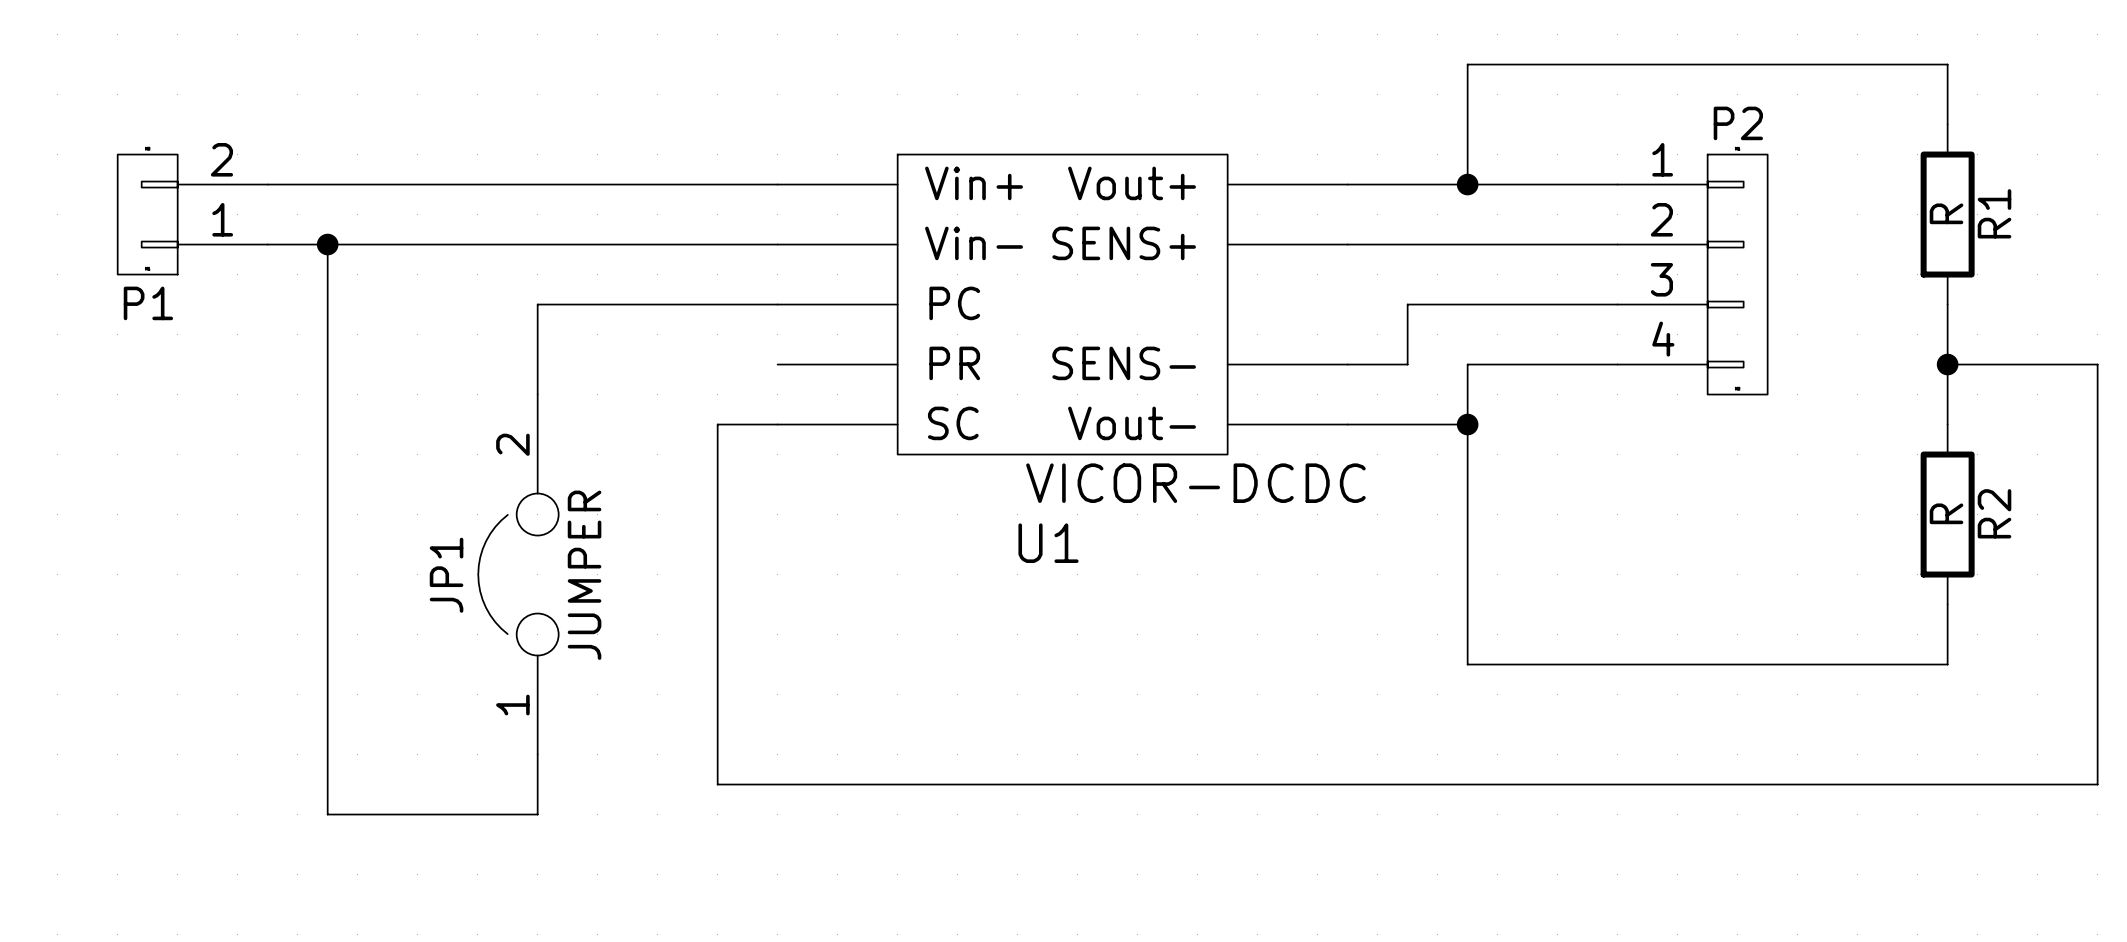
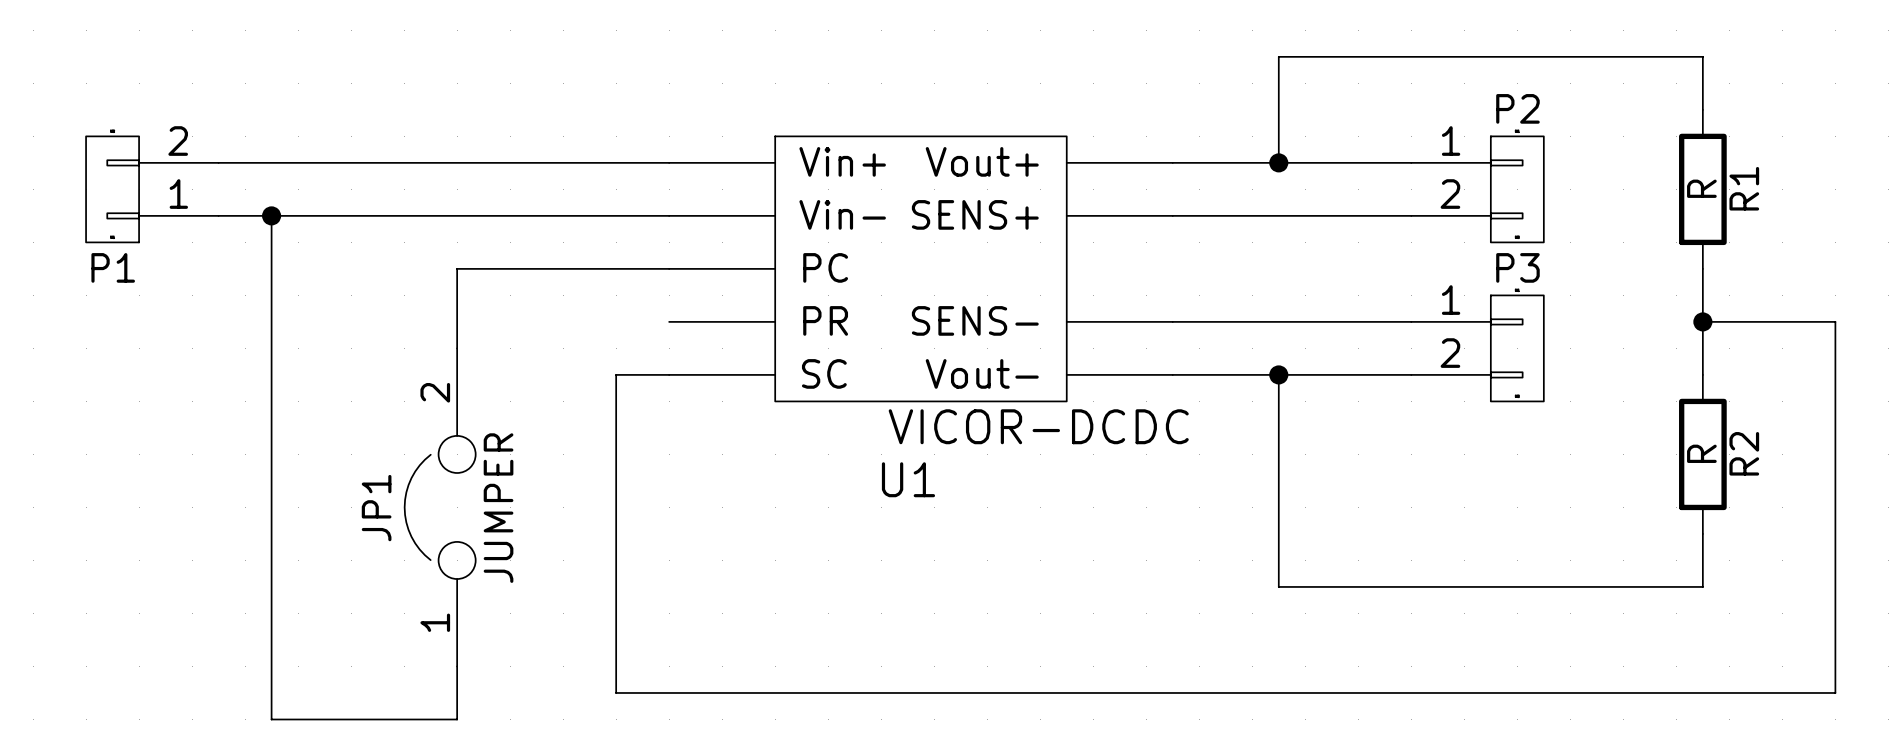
P2 symbol: [1617, 154, 1768, 395] -> [1411, 136, 1544, 243]
wire: (1617, 304) (1407, 304) (1407, 364) -> none
wire: (1467, 364) (1467, 424) -> (1278, 321) (1225, 321)
P3: none -> (1477, 348)
wire: none -> (1278, 374) (1411, 374)

